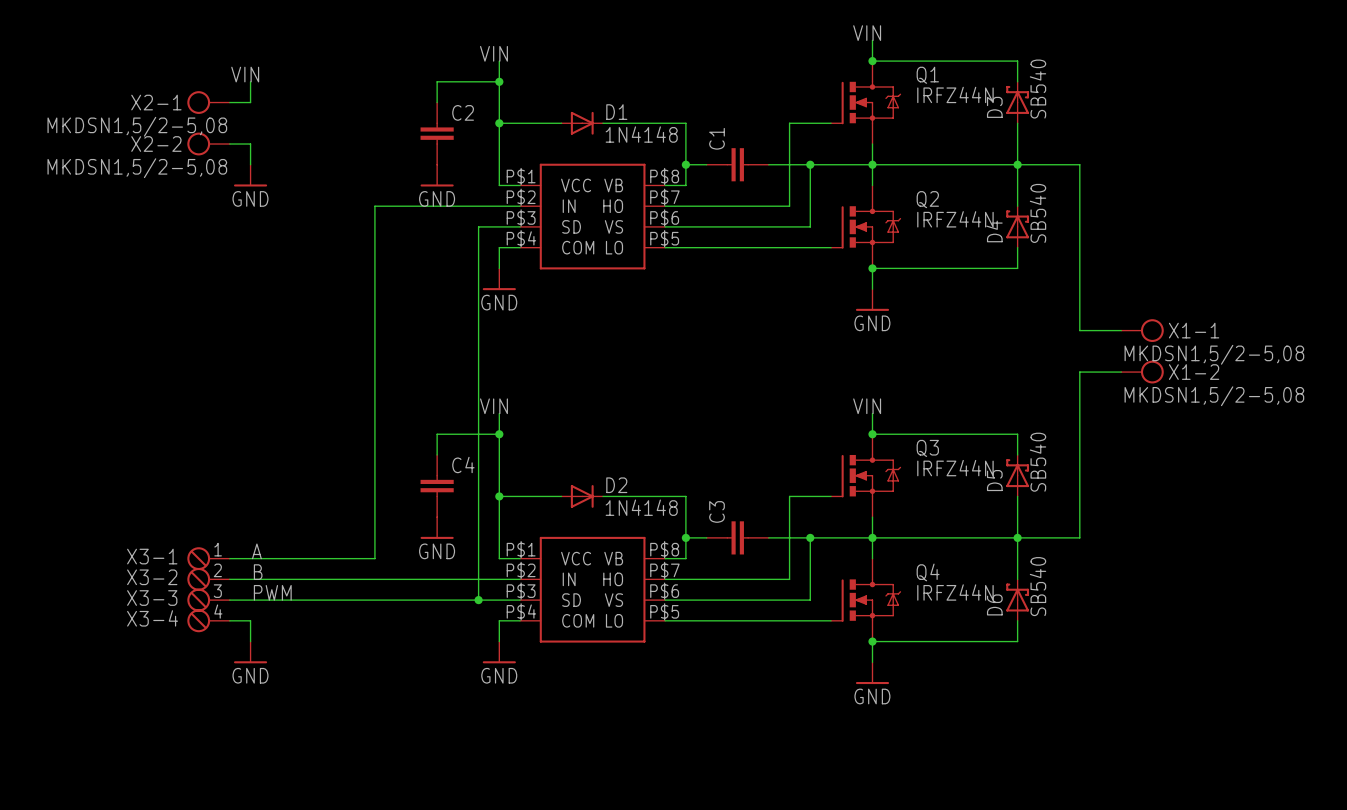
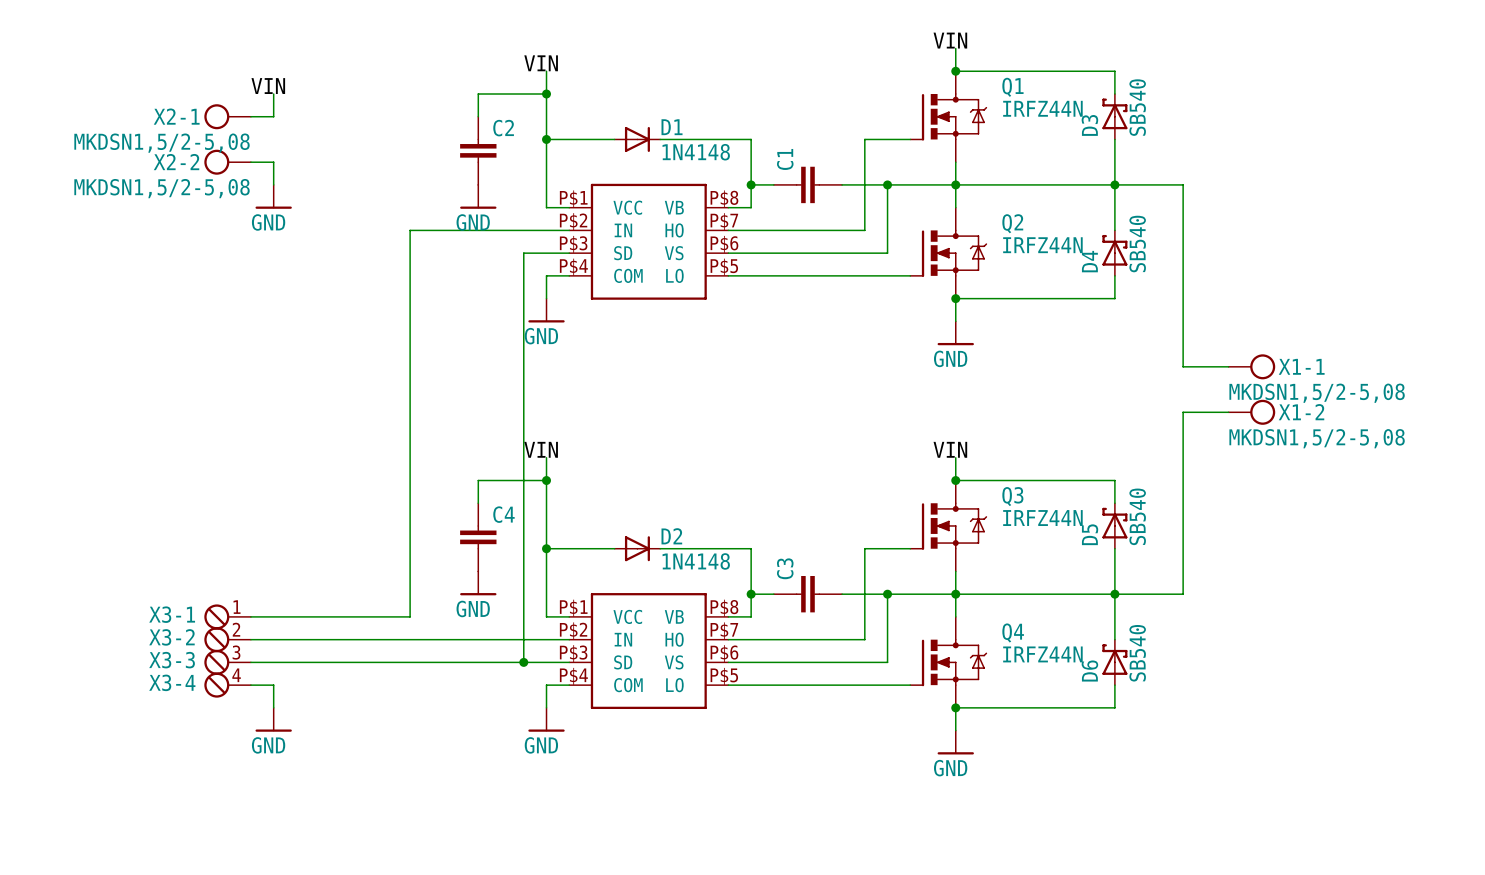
label: A (256, 551) -> none
label: B (258, 572) -> none
label: PWM (272, 592) -> none

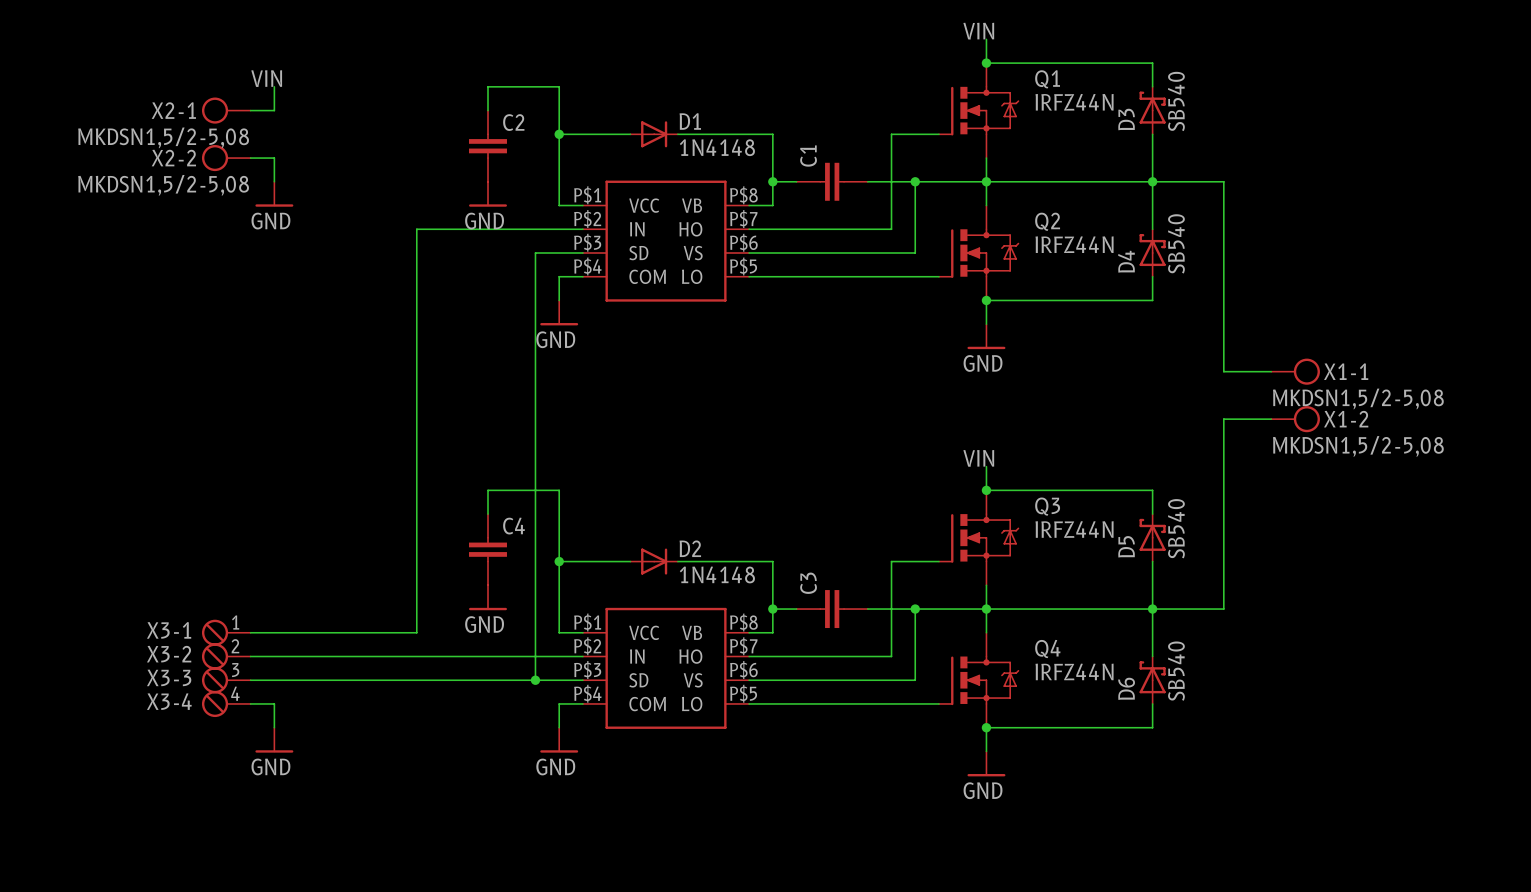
label: VIN (541, 63) -> none
wire: (546, 71) (546, 94) -> none
junction: (546, 94) -> none
label: VIN (541, 449) -> none
wire: (546, 457) (546, 480) -> none
junction: (546, 480) -> none

